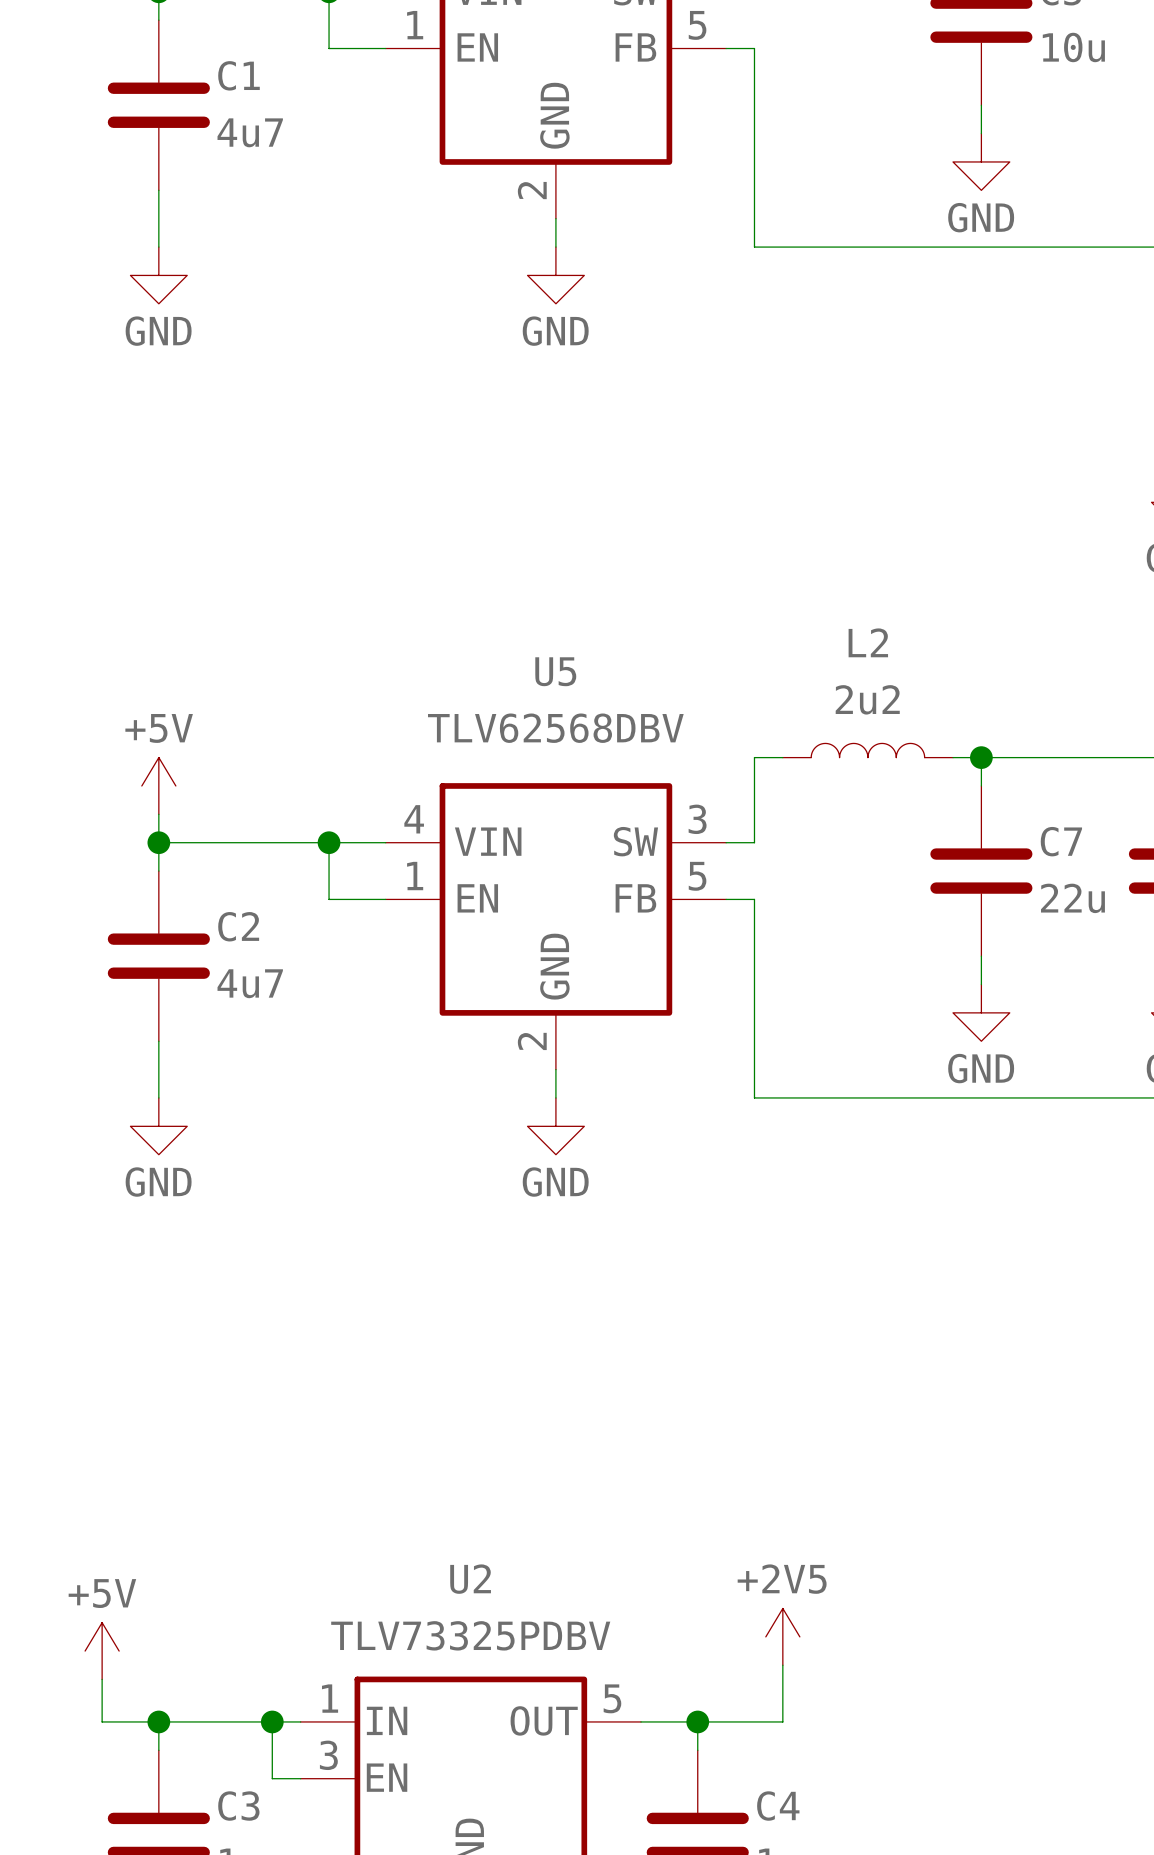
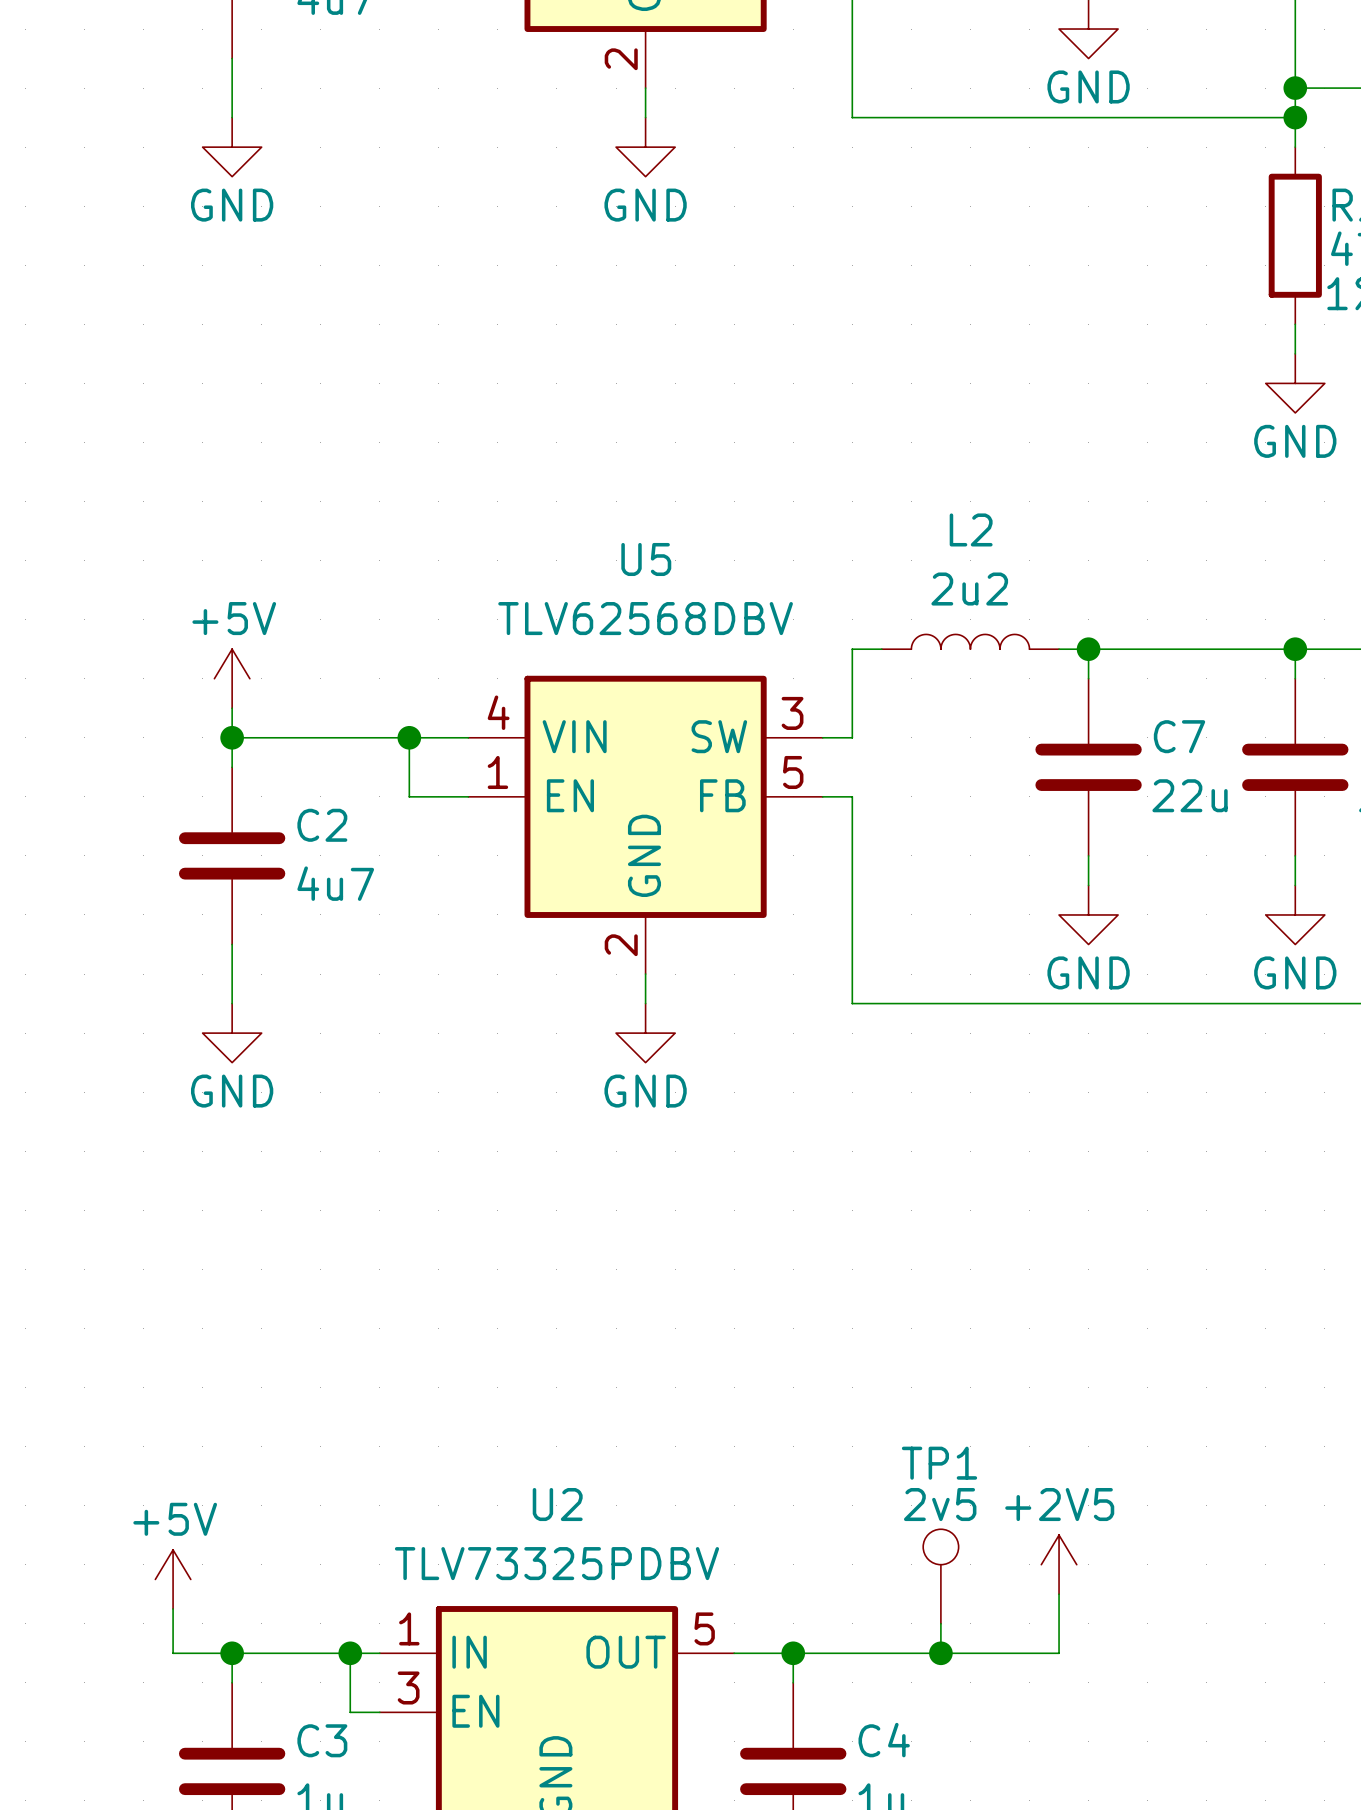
power symbol position: +2V5 (782, 1636) -> +2V5 (1059, 1564)
TP1: none -> 2v5 (940, 1576)
wire: (782, 1665) (782, 1721) -> (1059, 1594) (1059, 1653) (881, 1653)
wire: none -> (940, 1623) (940, 1653)
junction: none -> (940, 1653)

